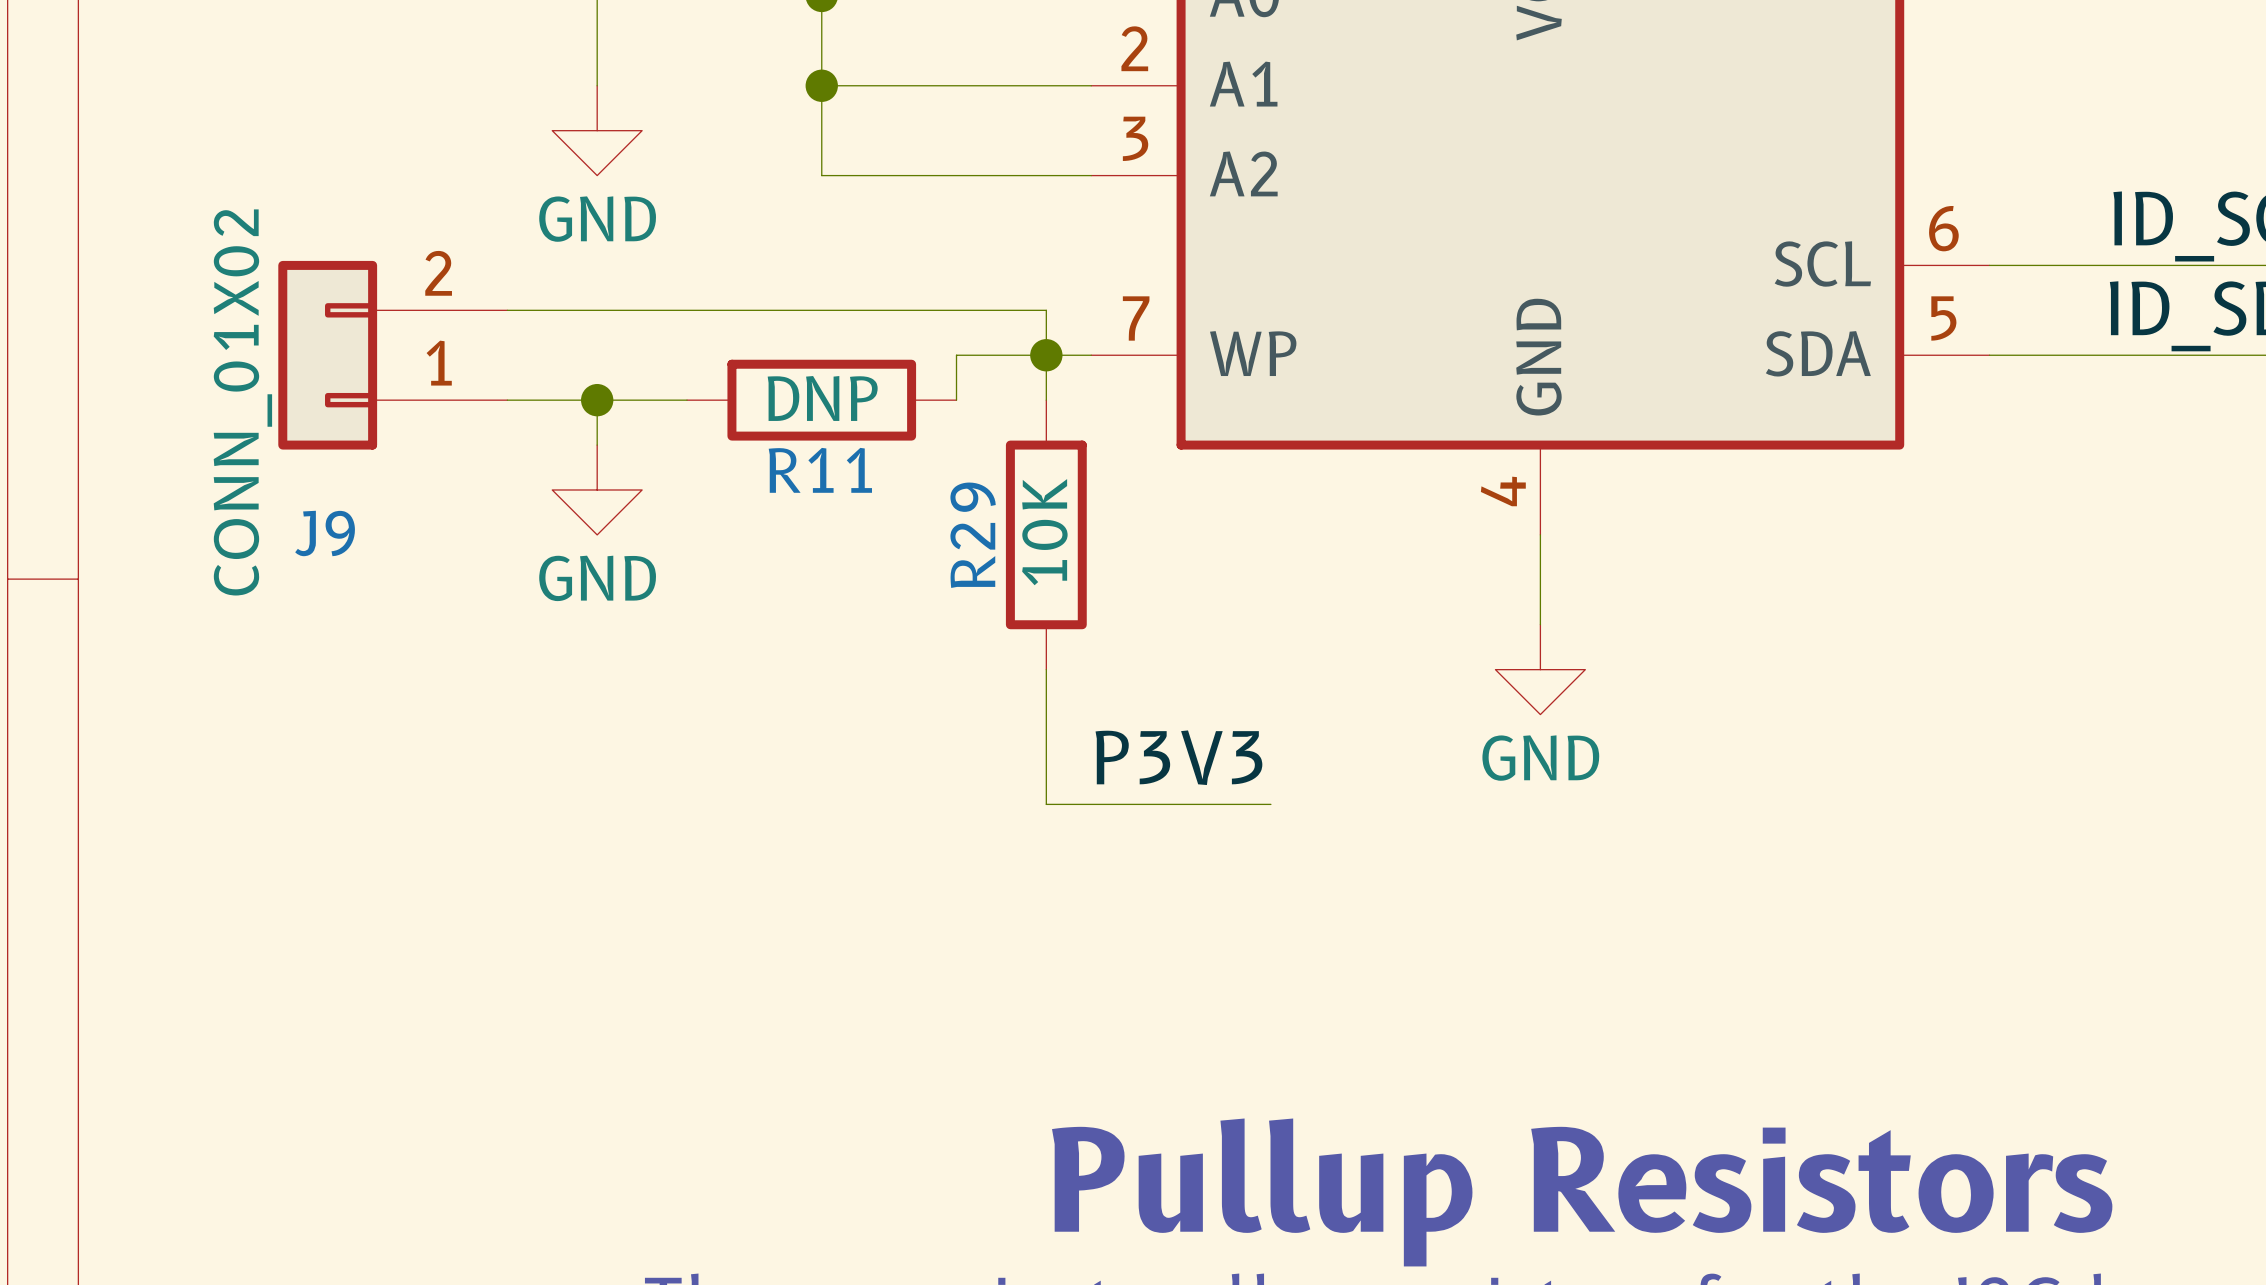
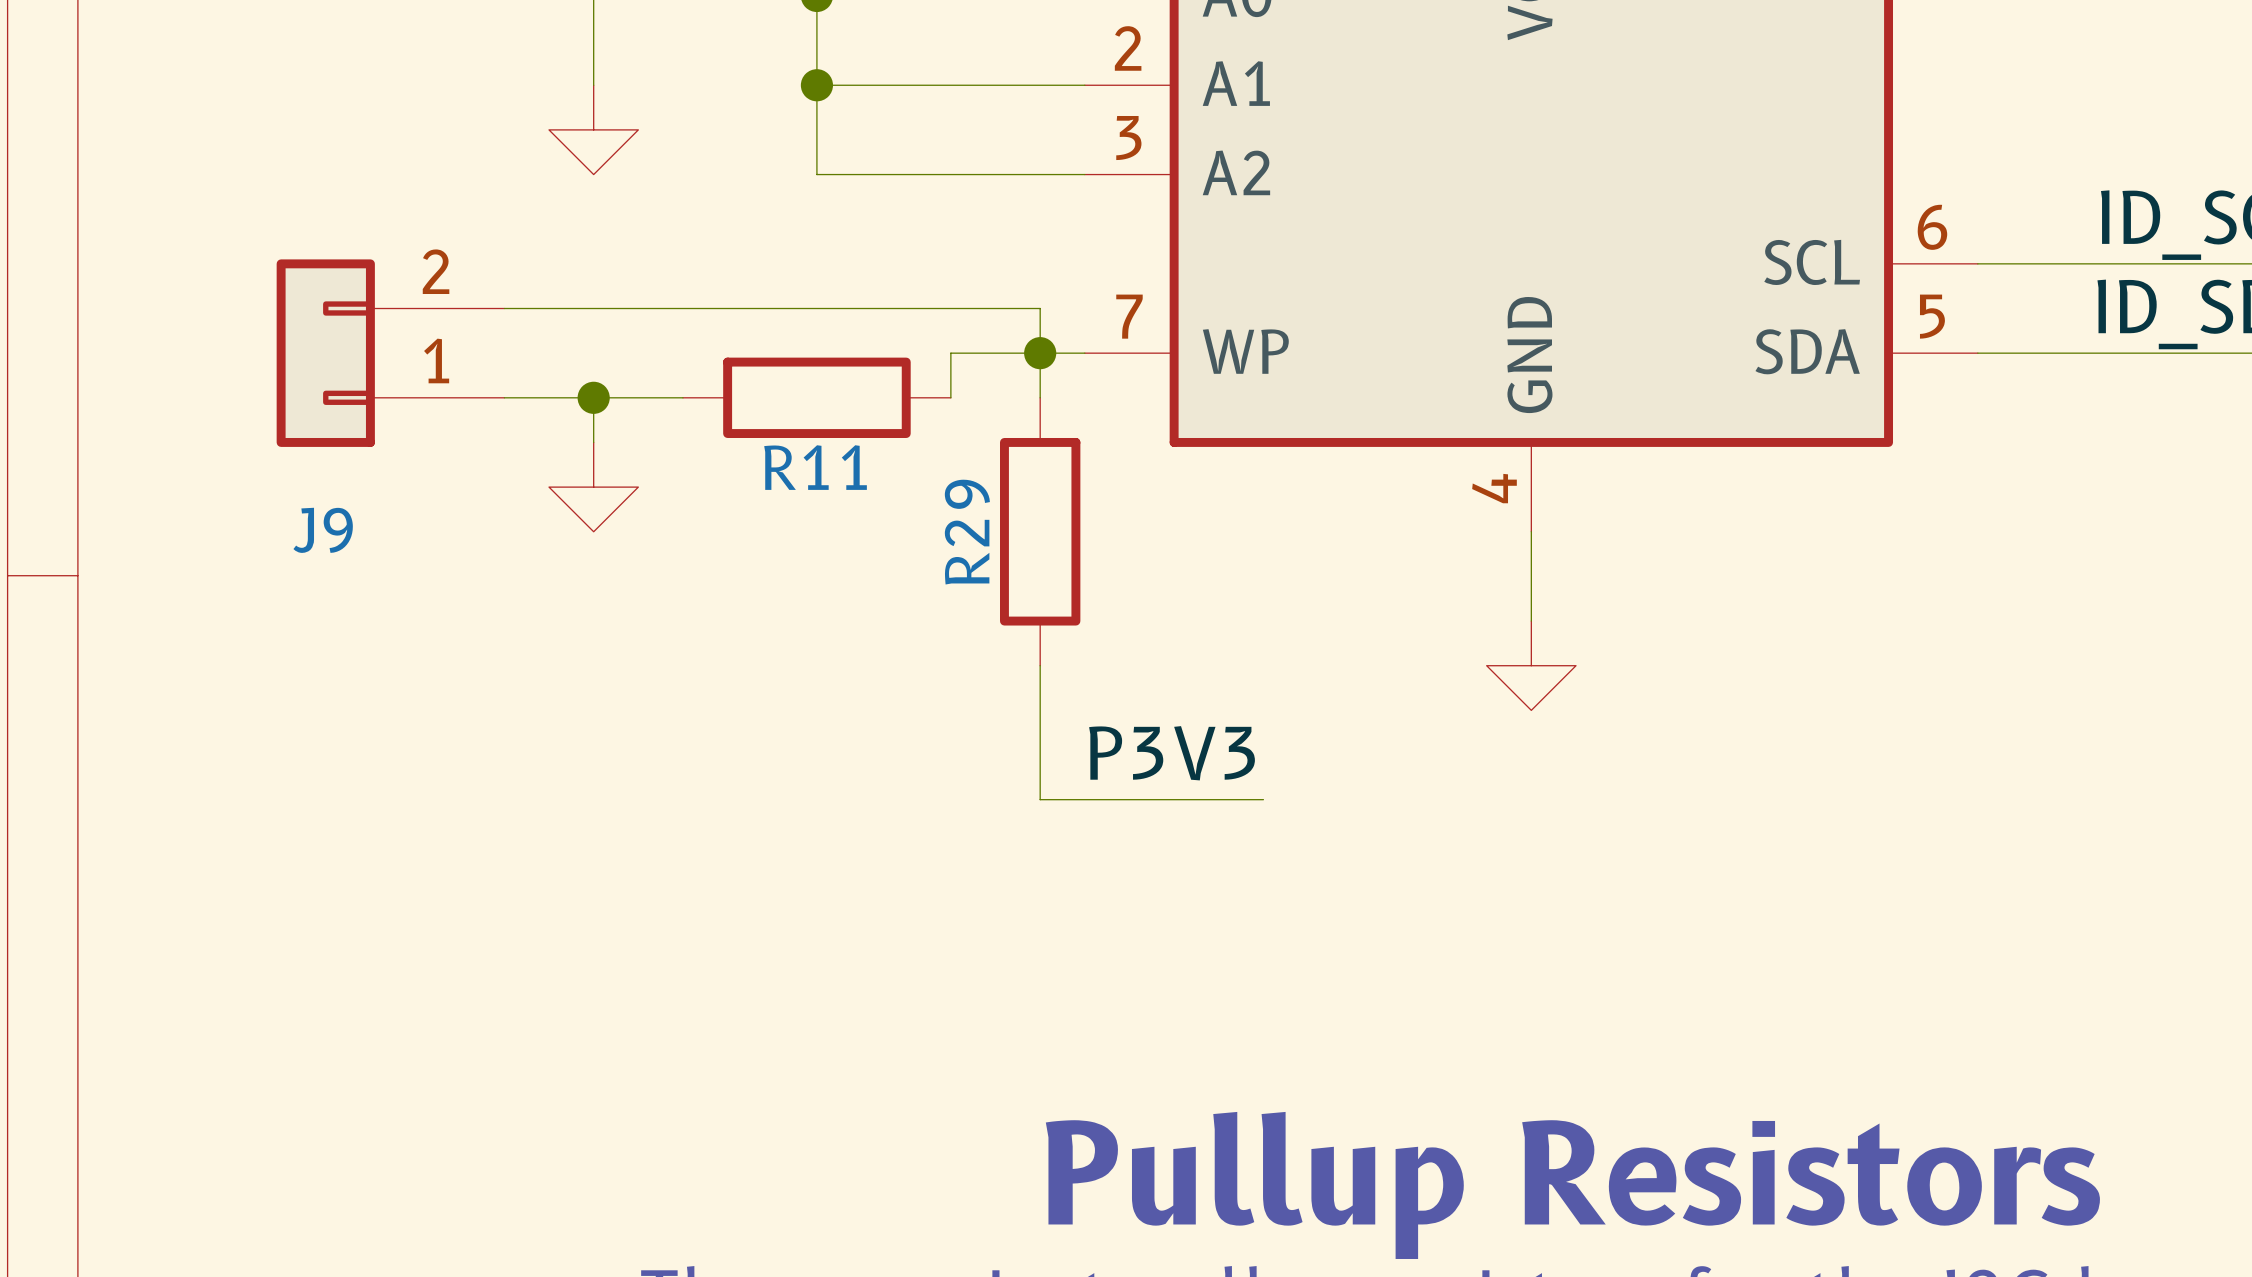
power symbol text: GND (597, 219) -> none
R11 value: DNP (822, 398) -> none
J9 value: CONN_01X02 (242, 402) -> none
R29 value: 10K (1044, 532) -> none
power symbol text: GND (597, 578) -> none
power symbol text: GND (1540, 758) -> none

